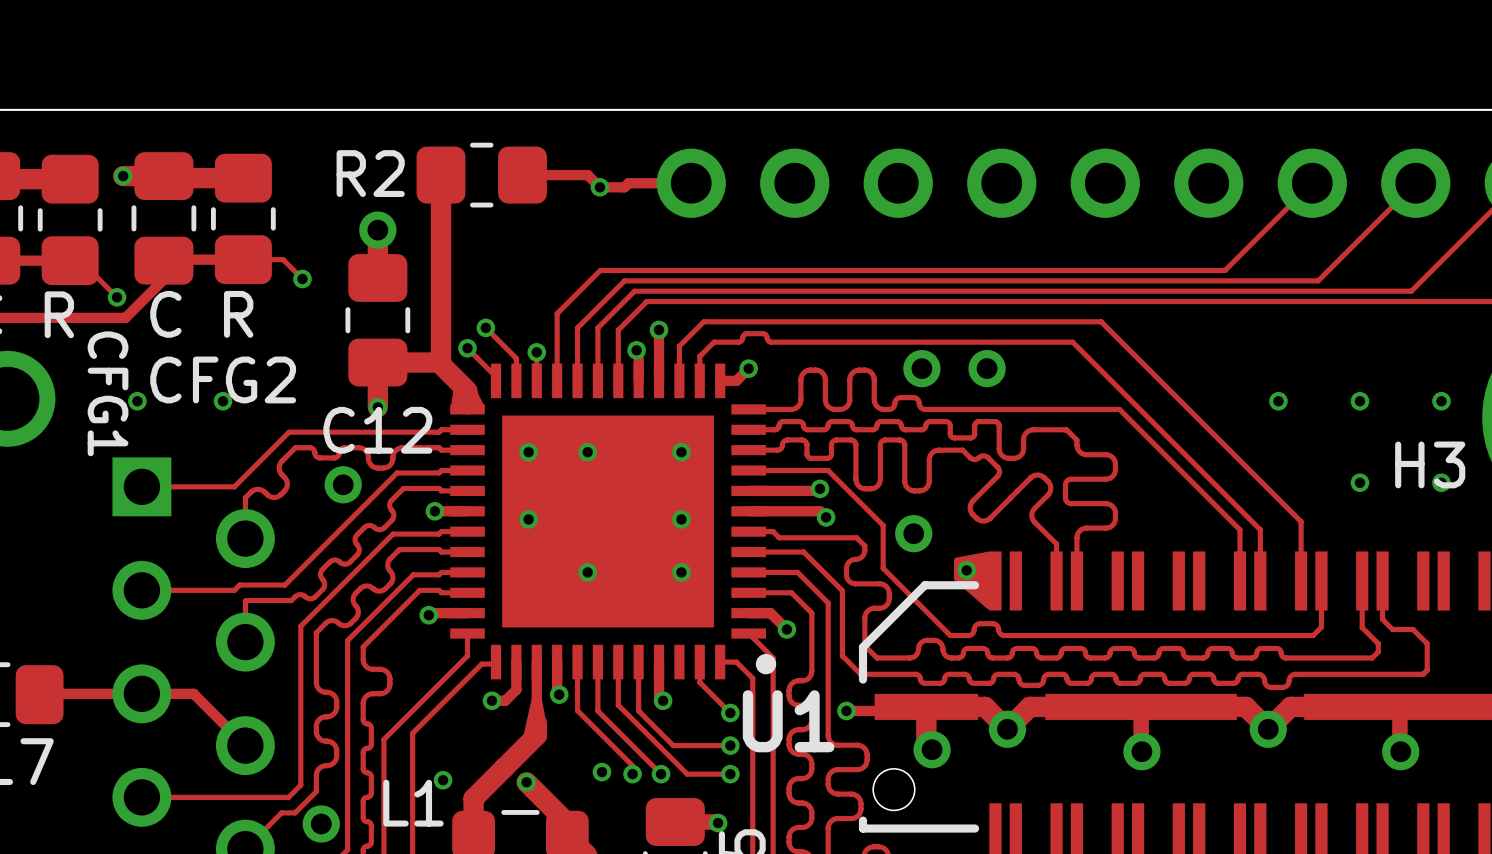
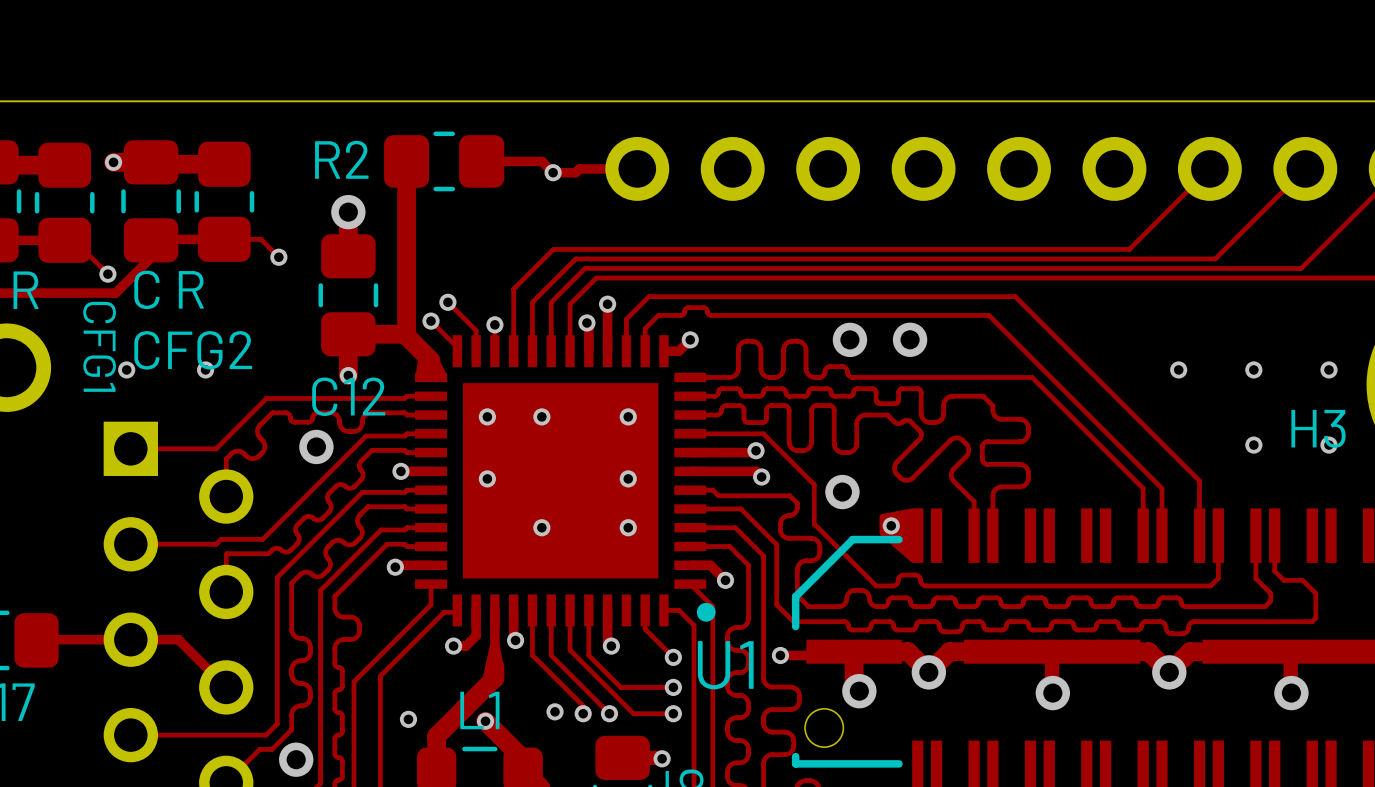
L1 name position: L1 (413, 803) -> L1 (479, 710)

